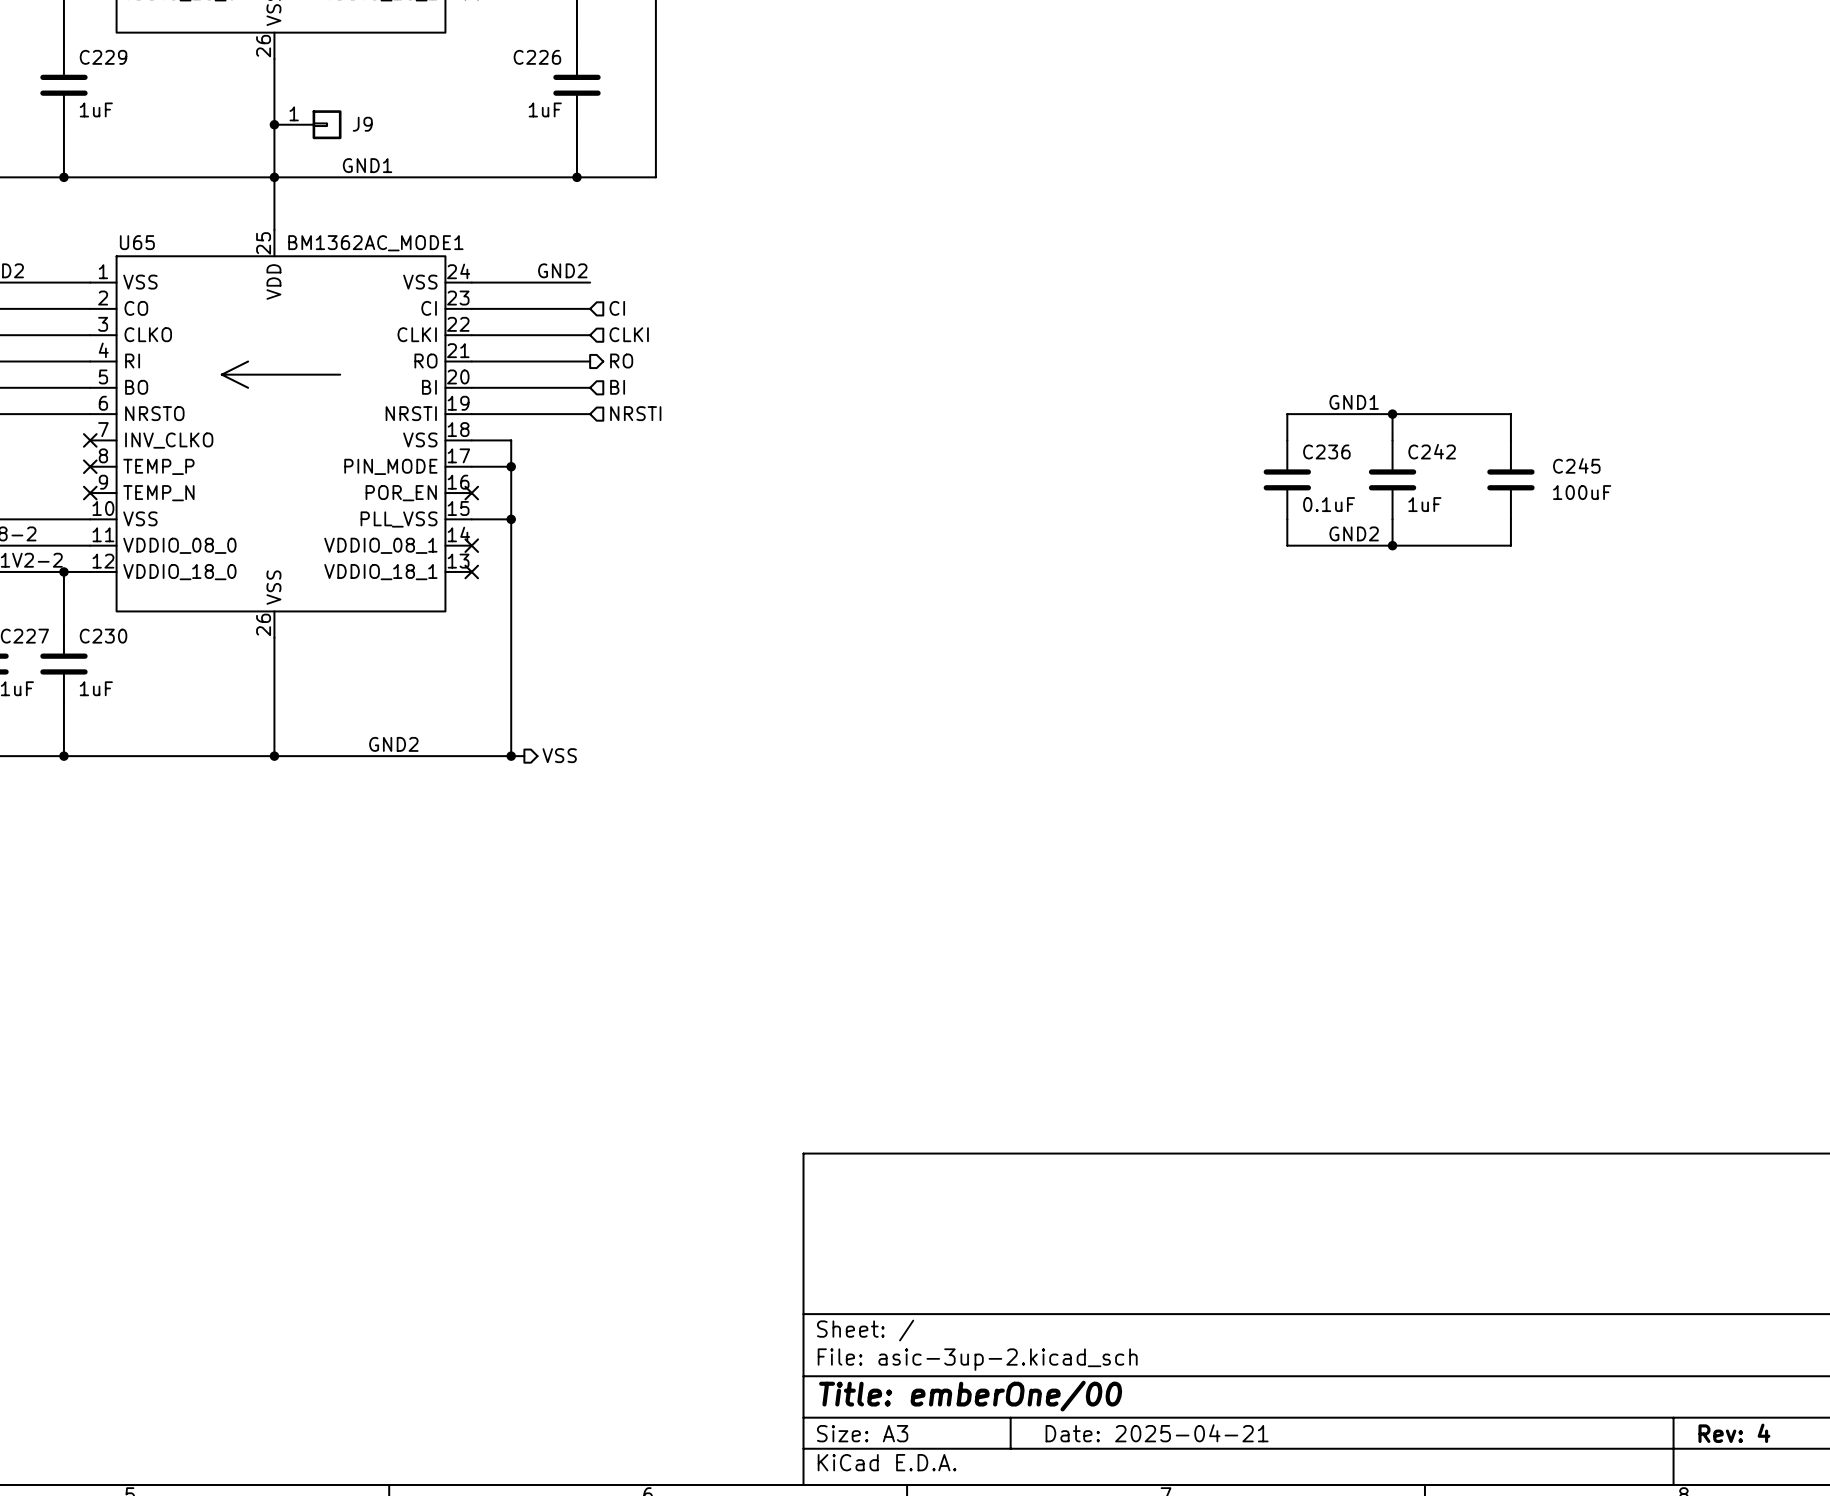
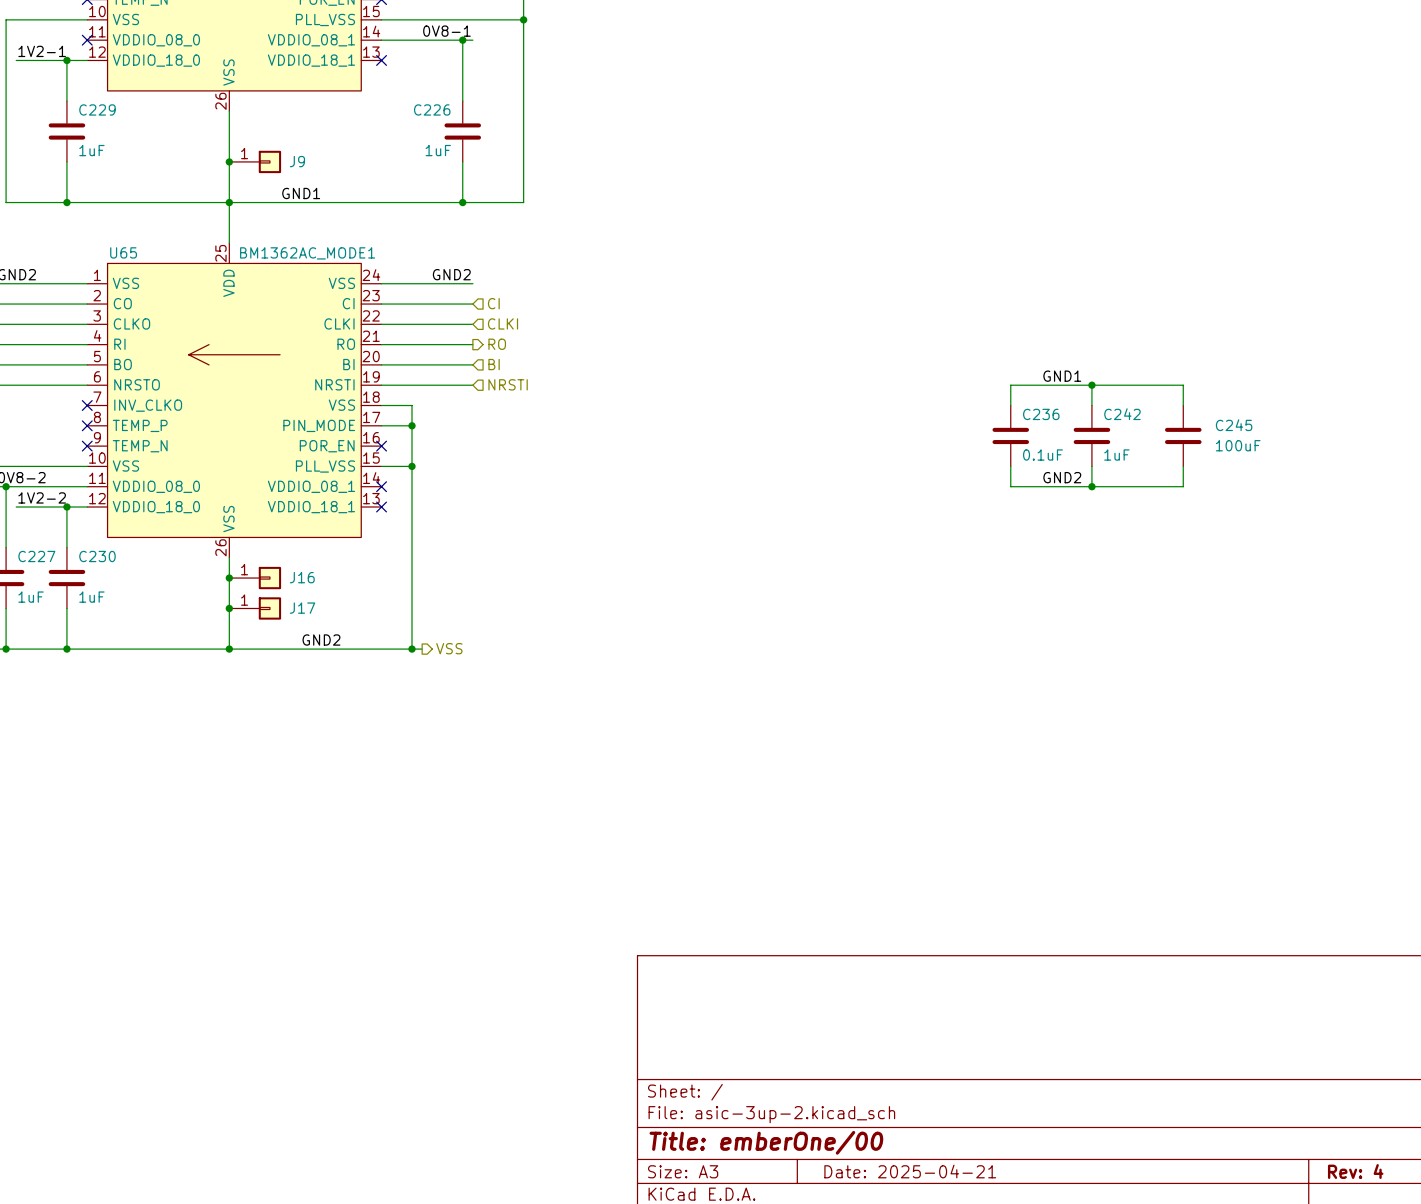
junction: none -> (229, 578)
J16: none -> (255, 578)
junction: none -> (229, 608)
J17: none -> (255, 608)

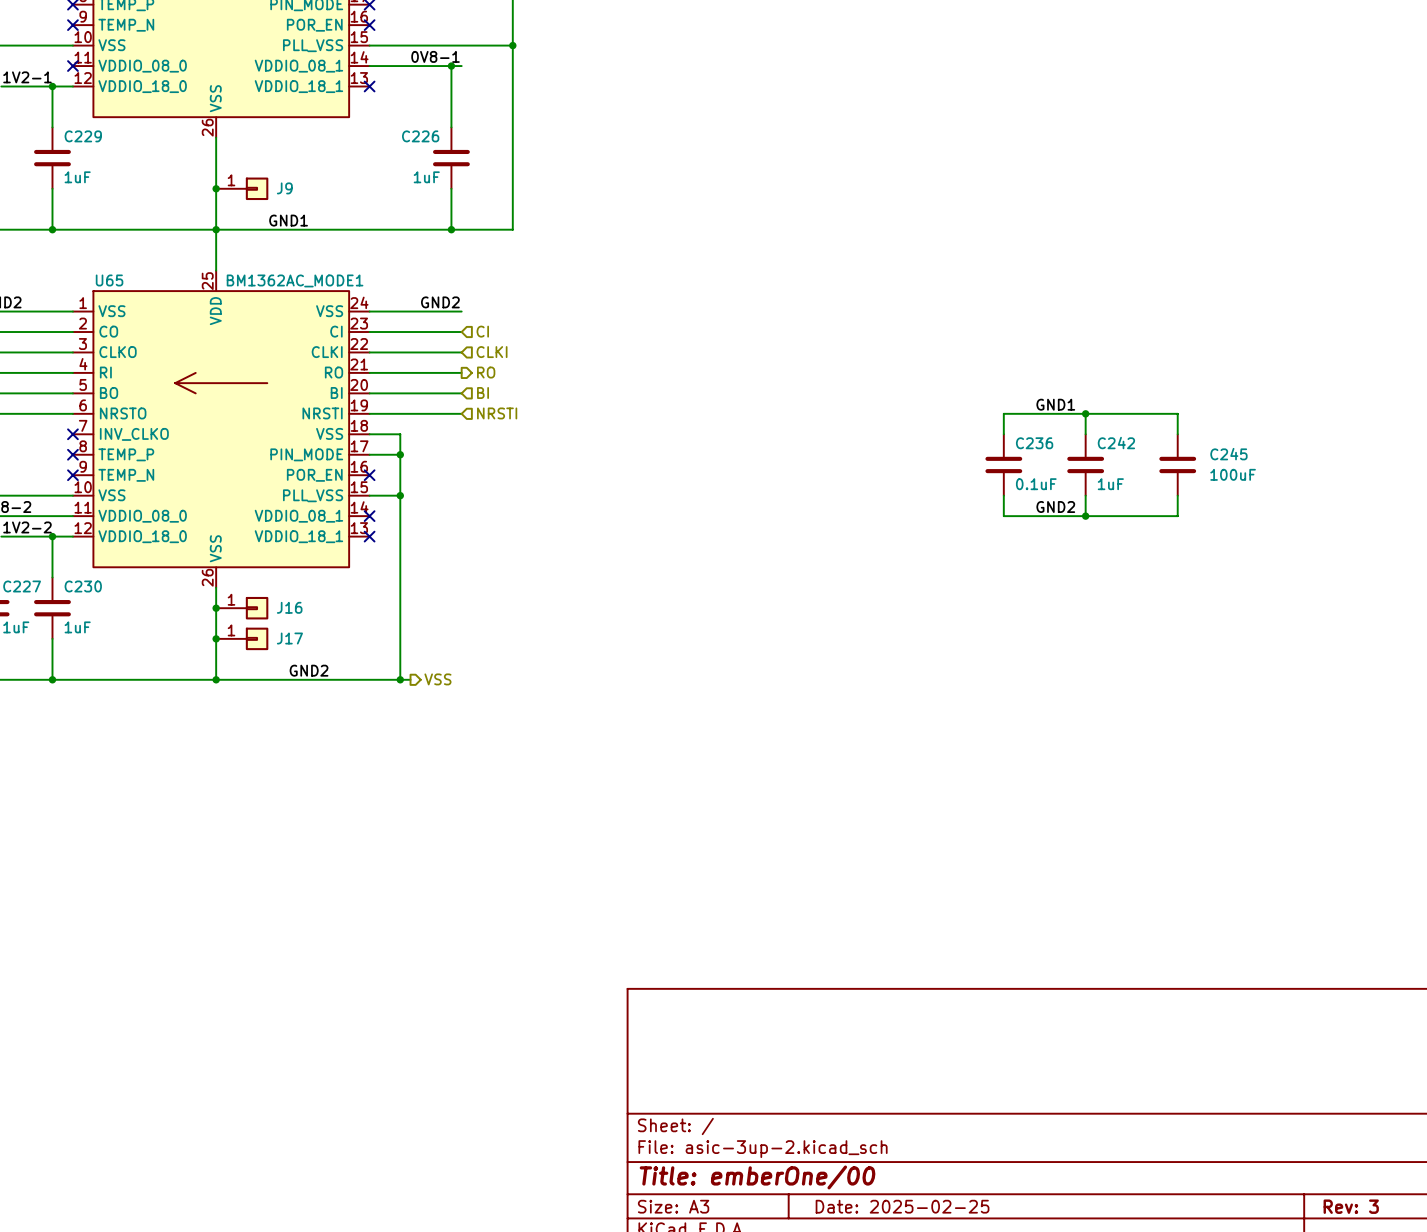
title block: Date: 2025-04-21 (910, 1171) -> Date: 2025-02-25 (902, 1206)
title block: Rev: 4 (1355, 1171) -> Rev: 3 (1351, 1206)

